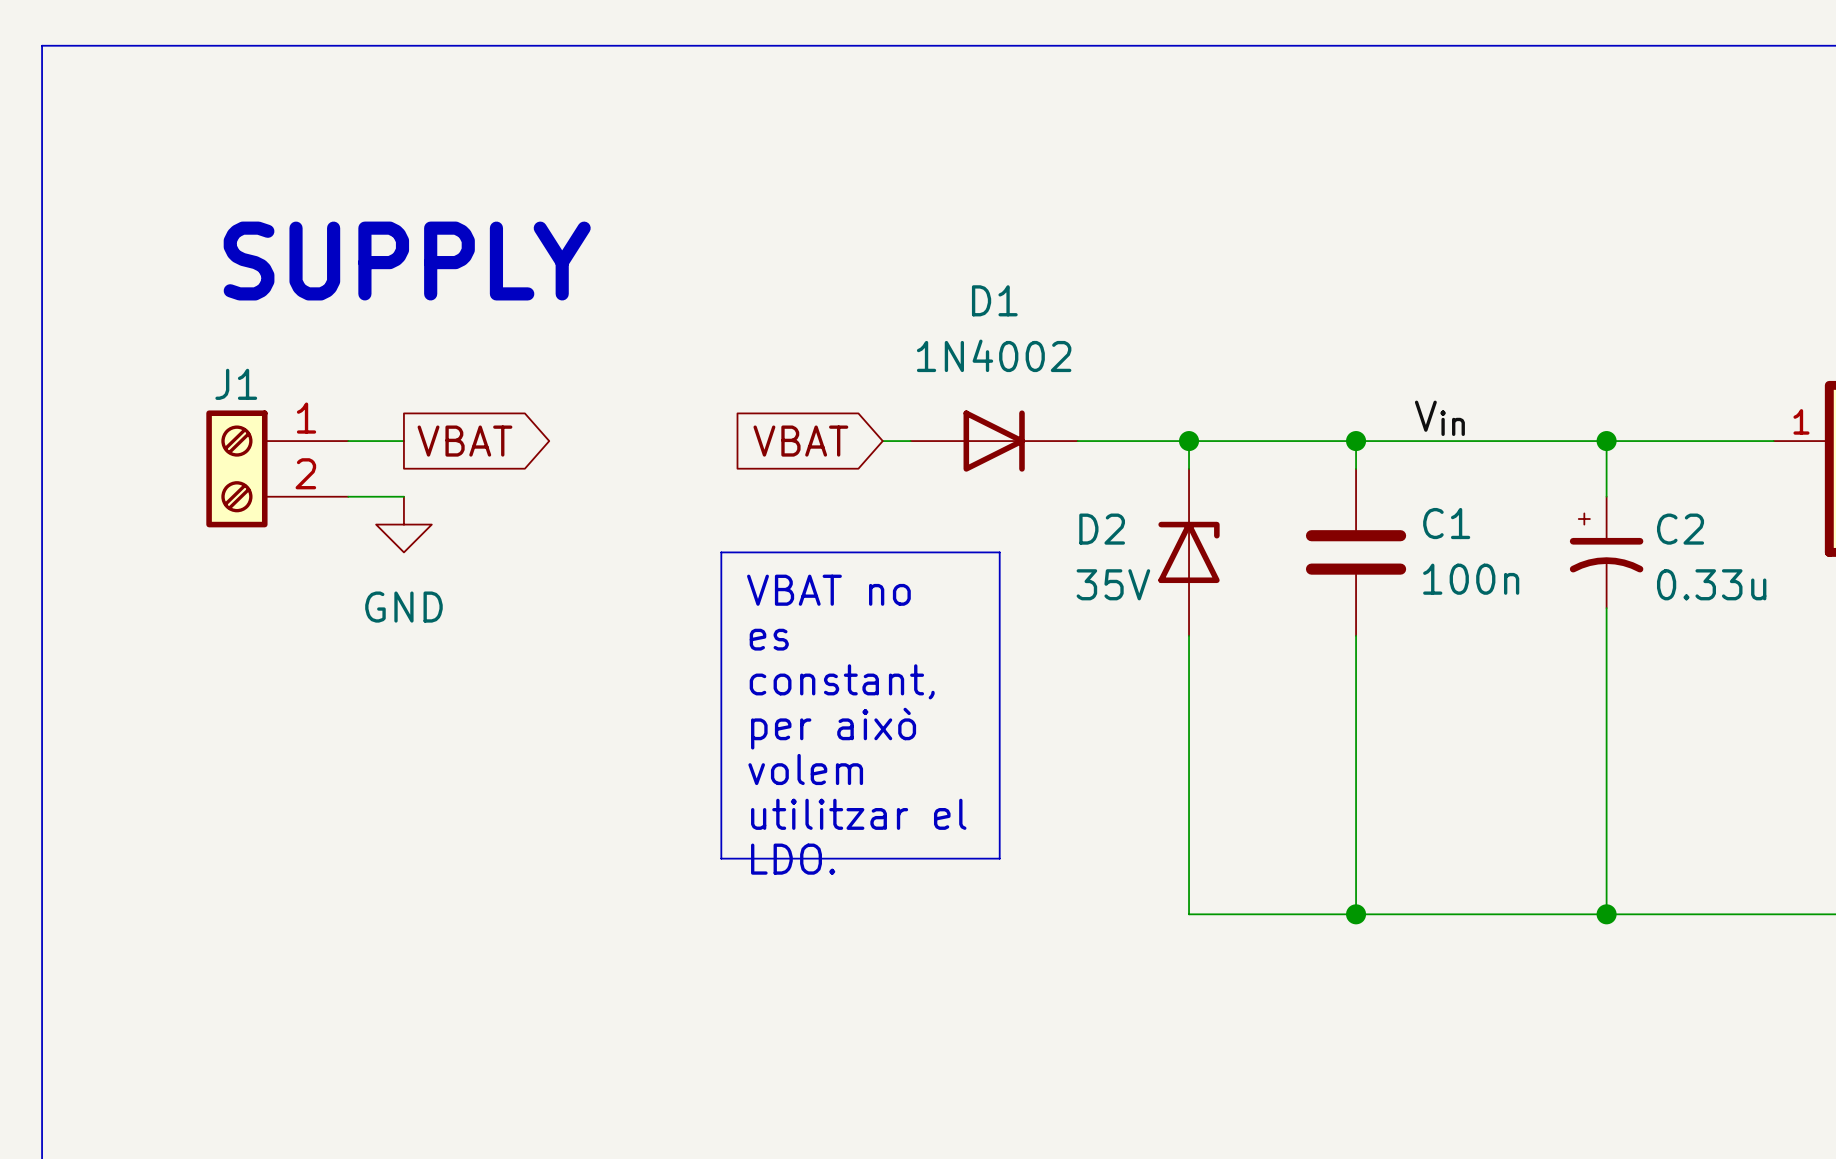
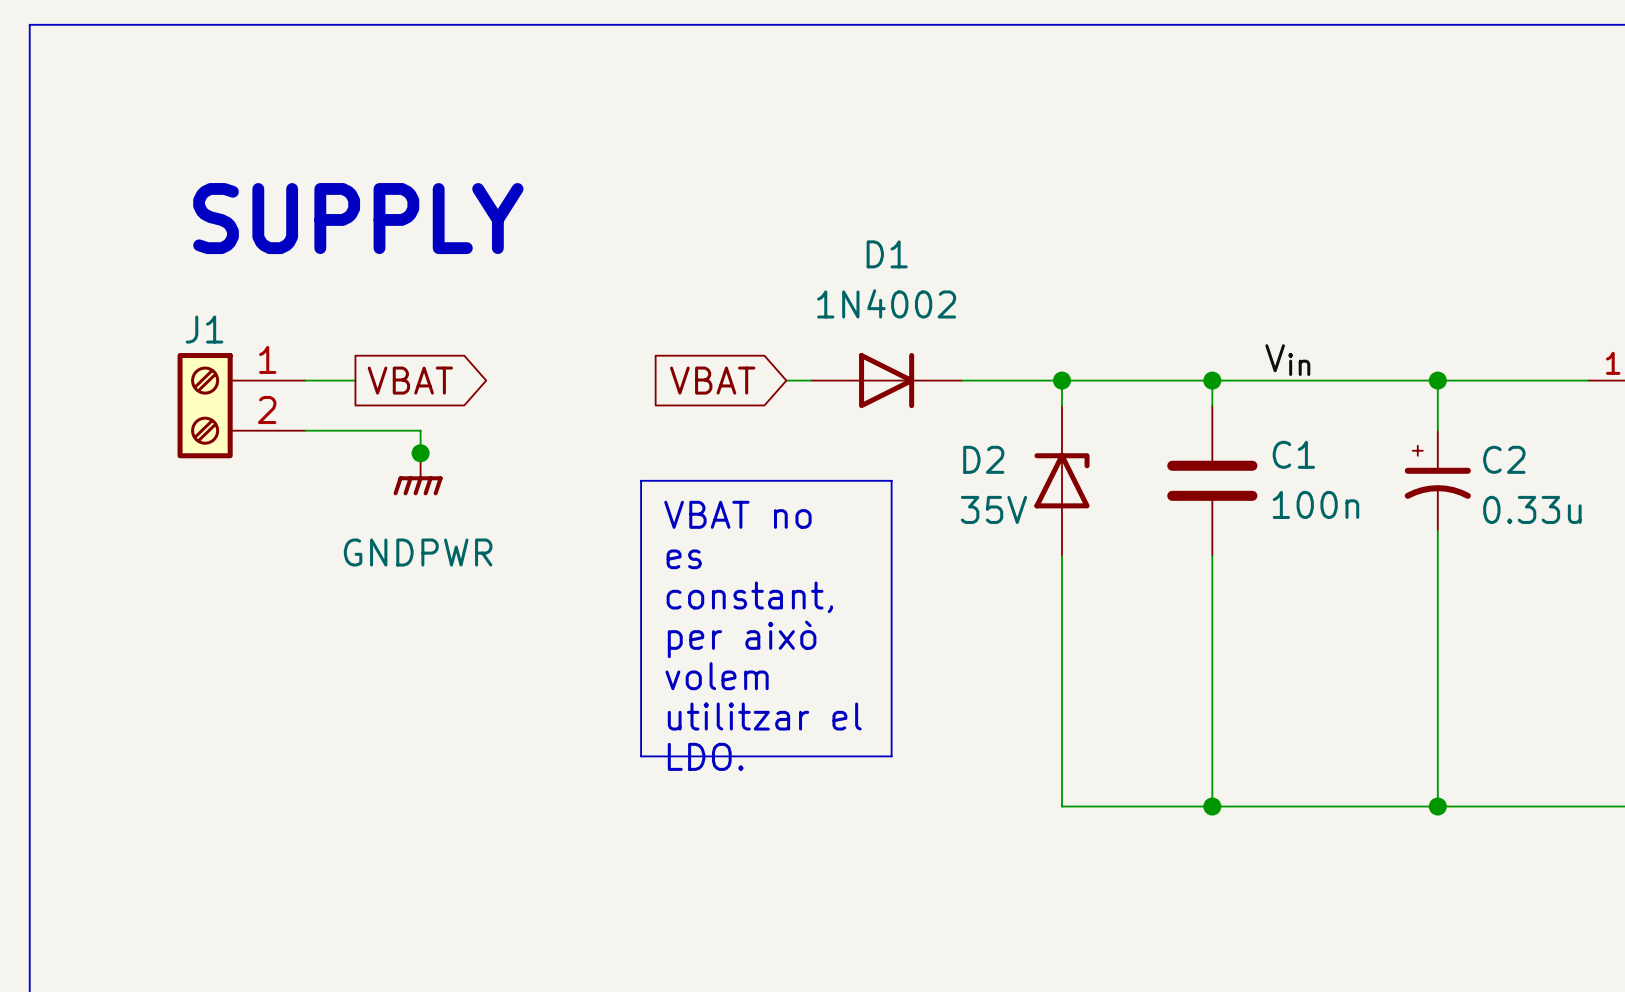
wire: none -> (355, 430) (420, 430) (420, 458)
junction: none -> (420, 453)
power symbol: GND (403, 524) -> none
power symbol: none -> GNDPWR (418, 474)

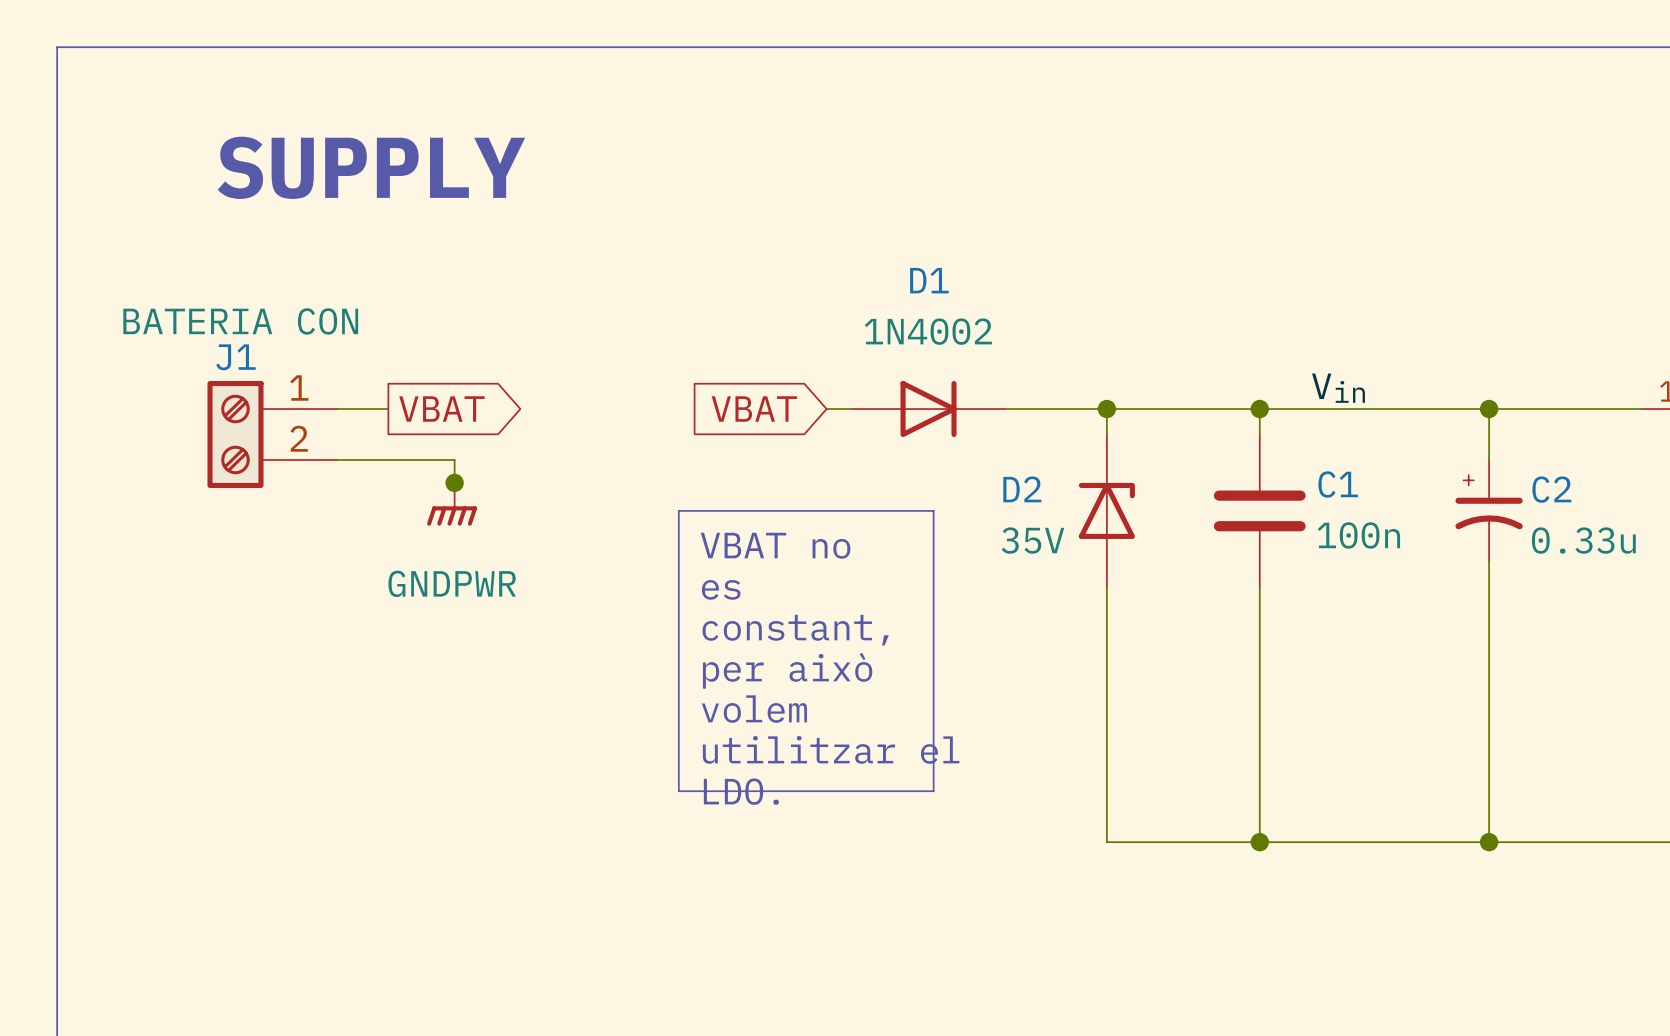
text position: SUPPLY (358, 218) -> SUPPLY (371, 167)
J1 value: none -> BATERIA CON (240, 321)

